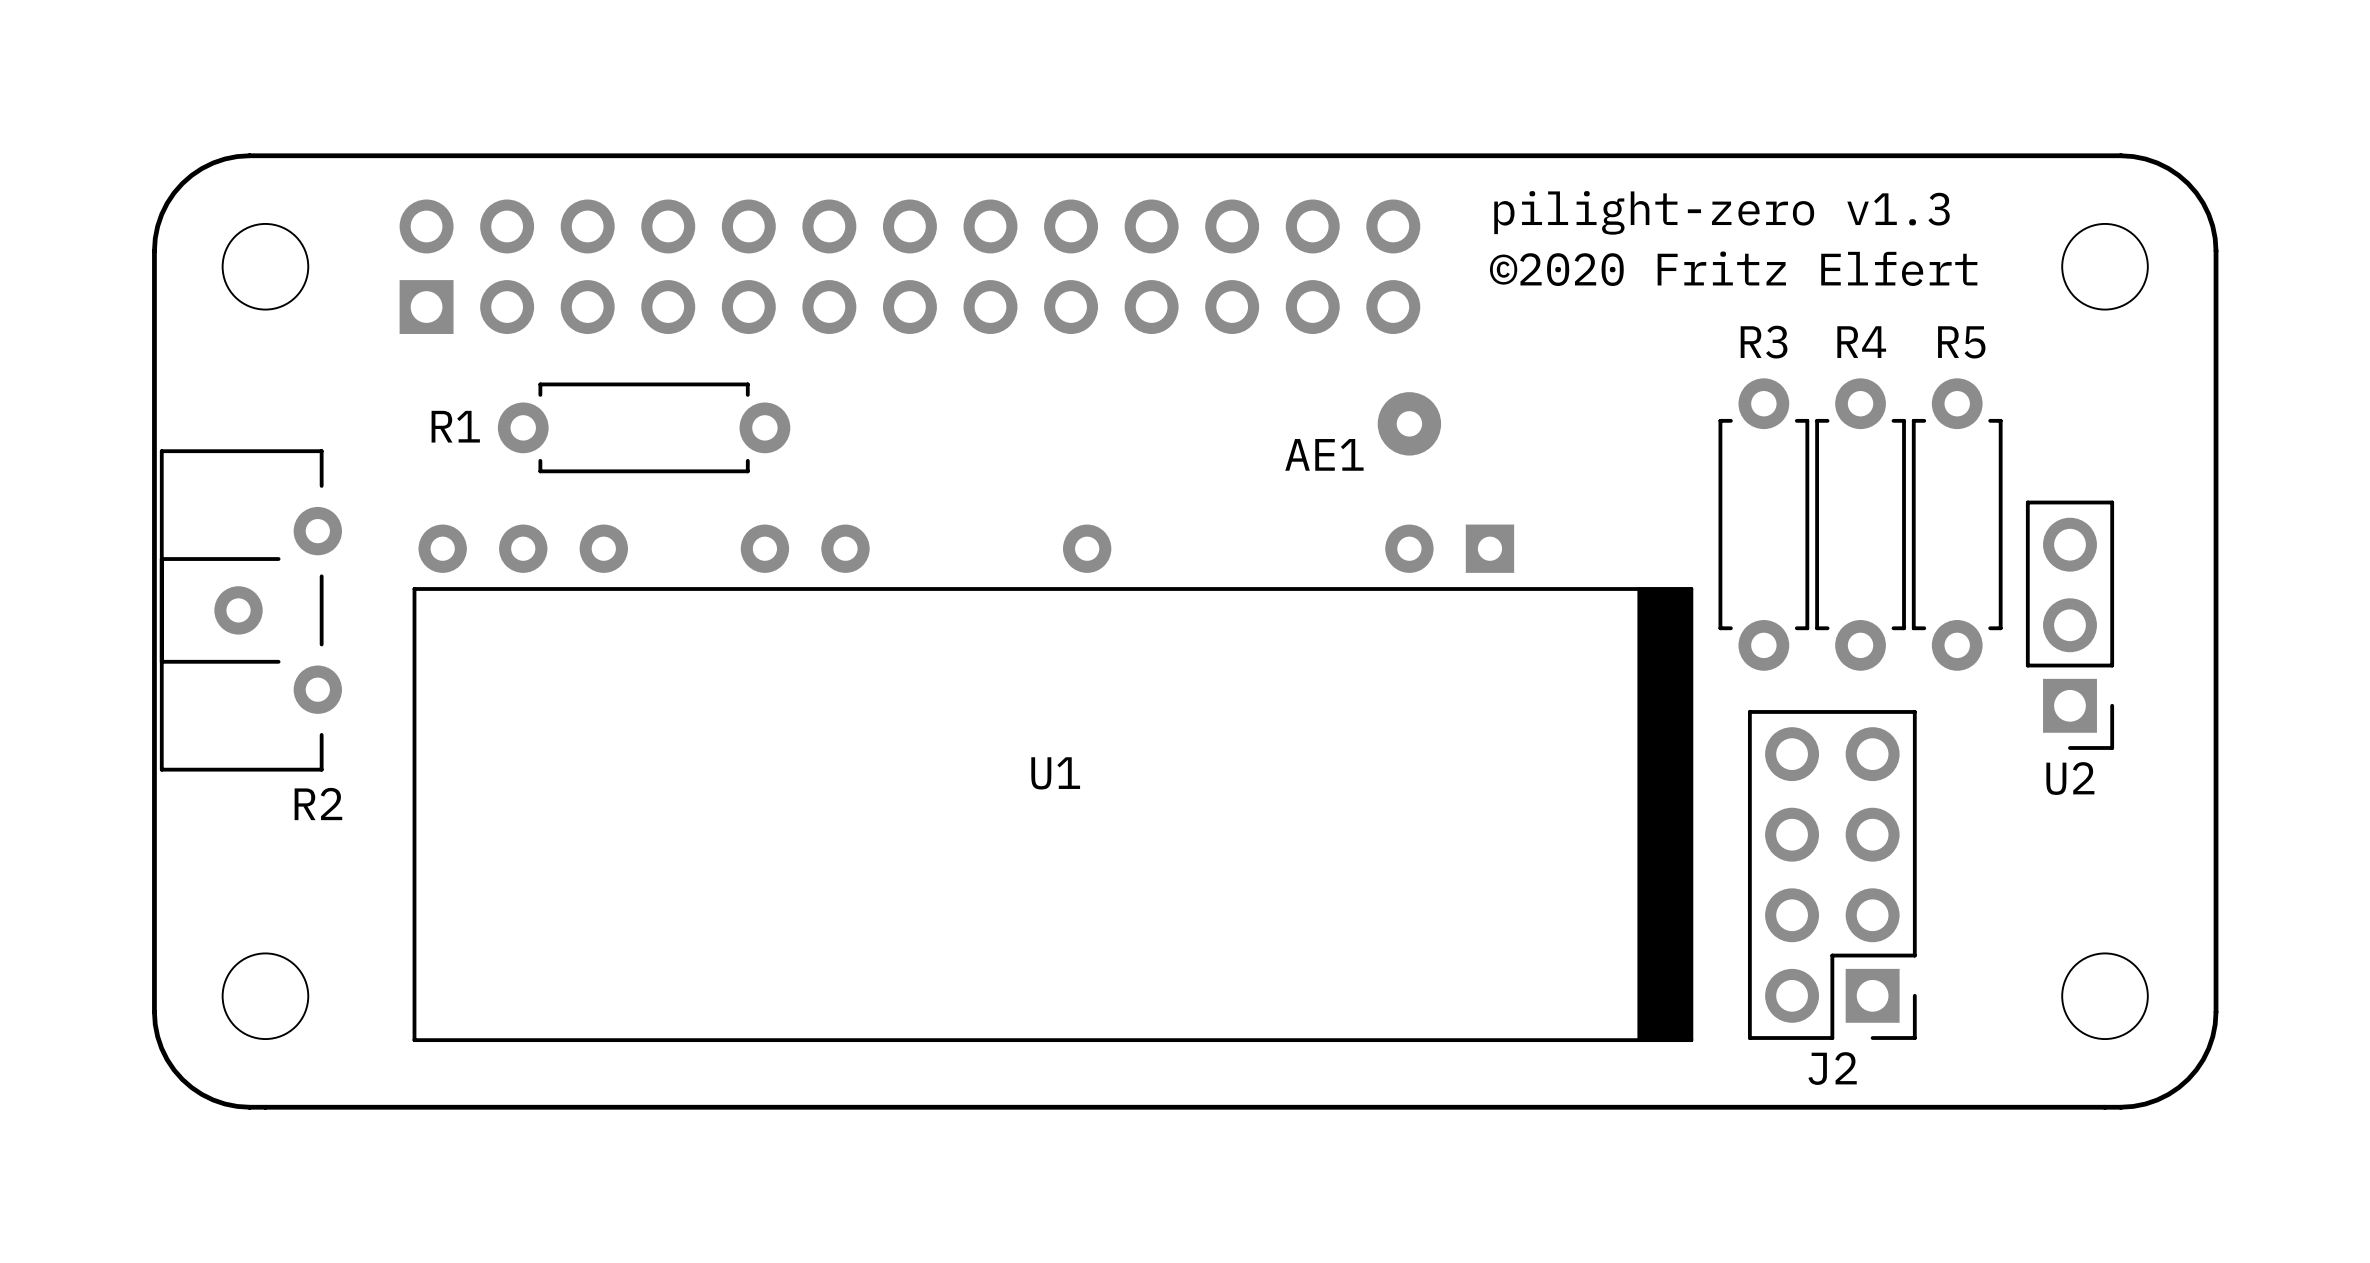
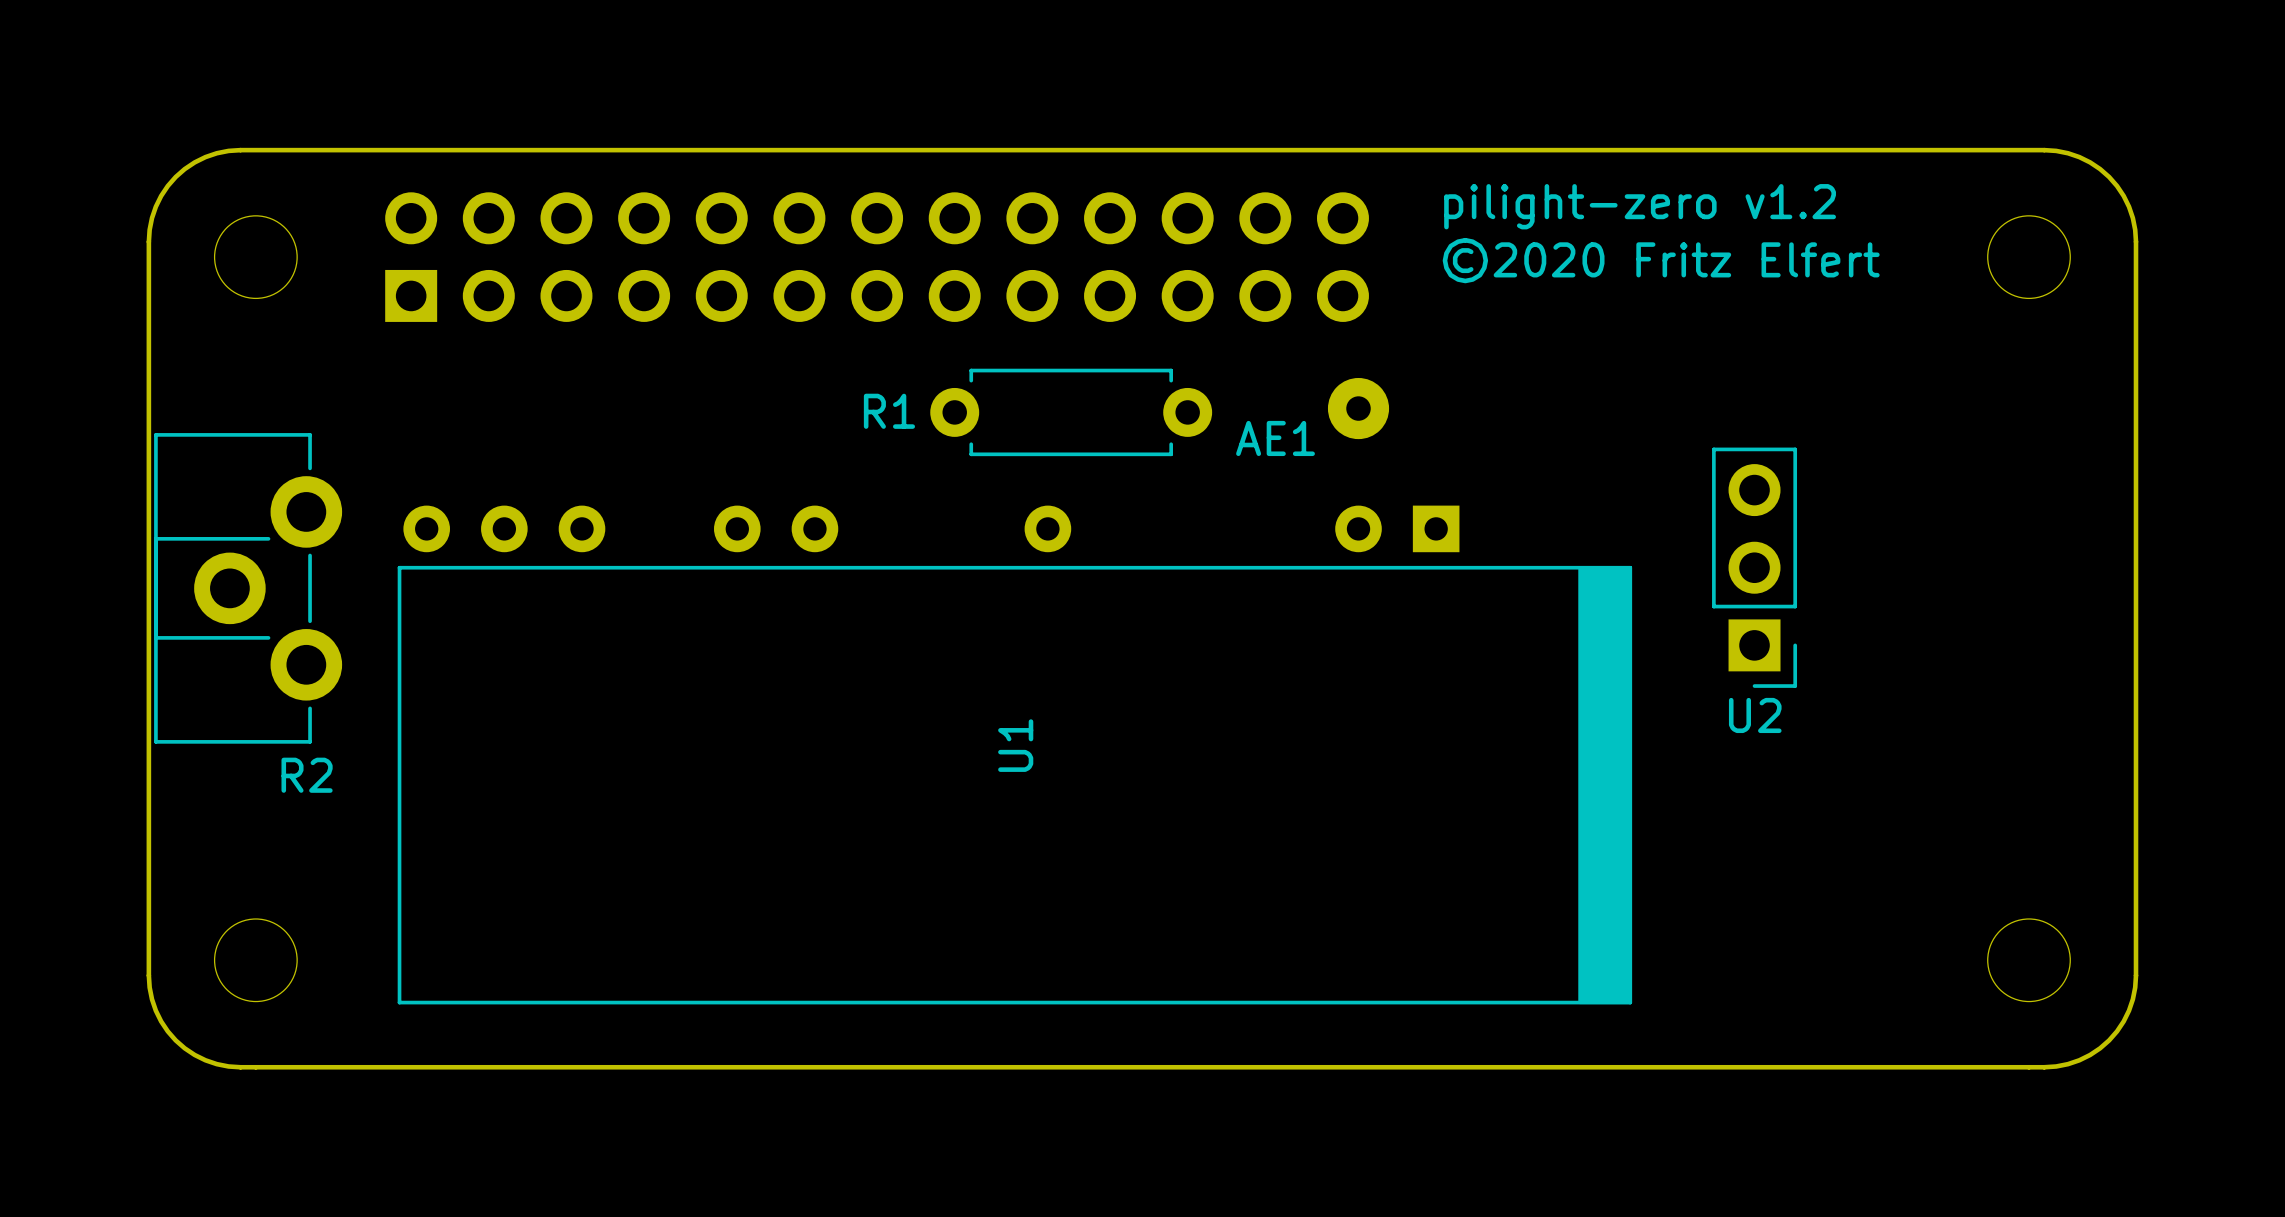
text: pilight-zero v1.3 (1722, 212) -> pilight-zero v1.2 (1640, 206)
R1 position: (644, 427) -> (1071, 412)
R2 footprint: [159, 449, 342, 772] -> [154, 433, 343, 744]
R3: (1763, 524) -> none
R4: (1860, 524) -> none
R5: (1957, 524) -> none
U2 position: (2070, 625) -> (1754, 567)
U1 name rotation: 0° (1055, 773) -> 90° counterclockwise (1015, 745)
J2: (1832, 874) -> none

